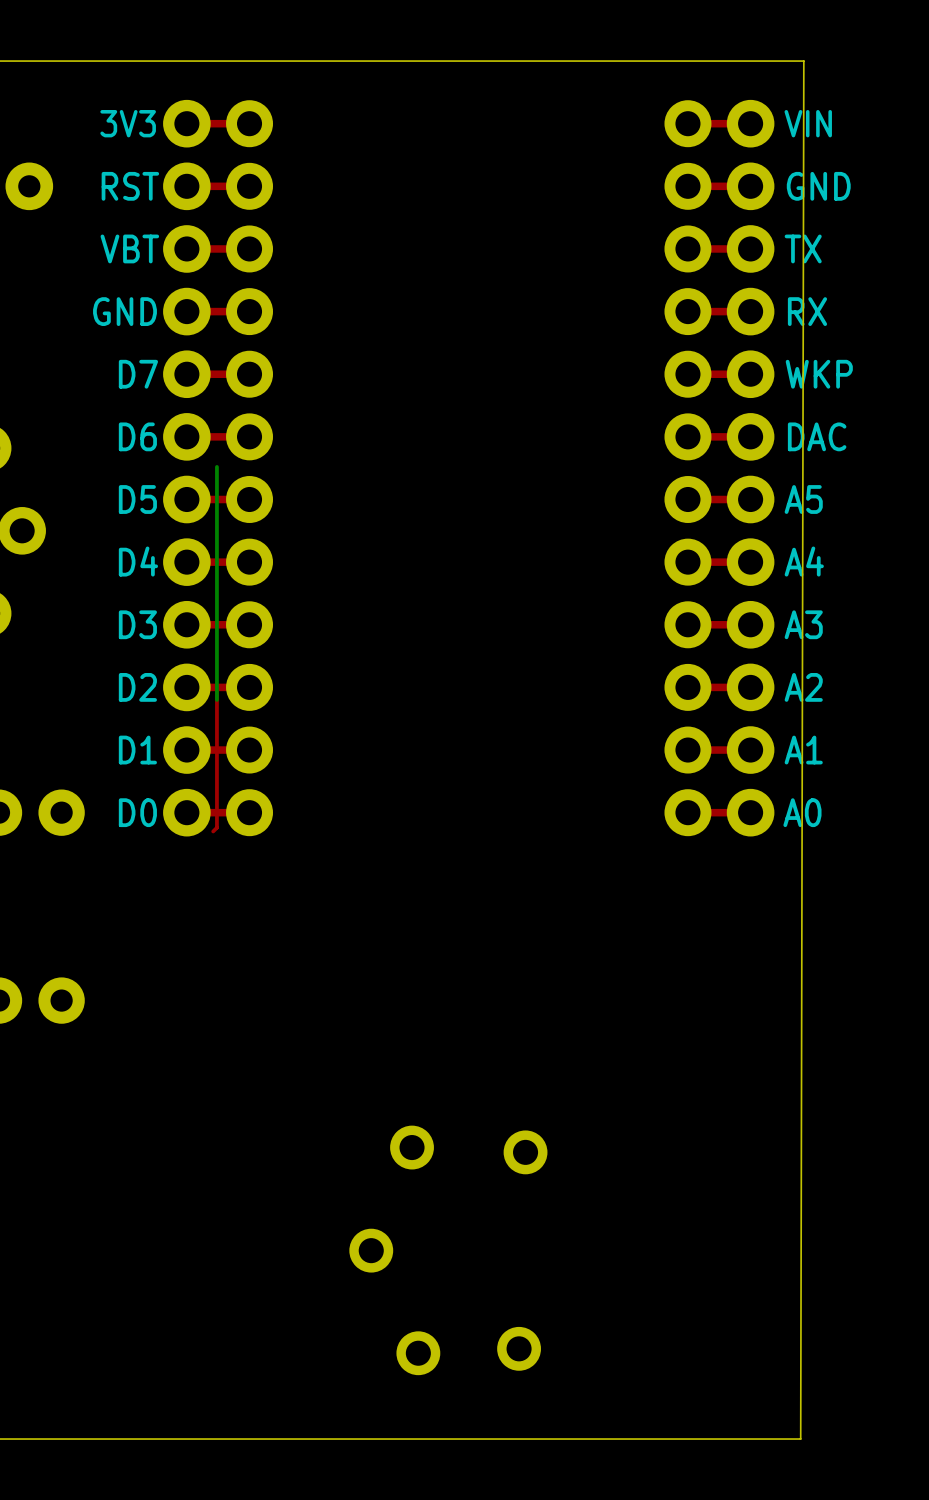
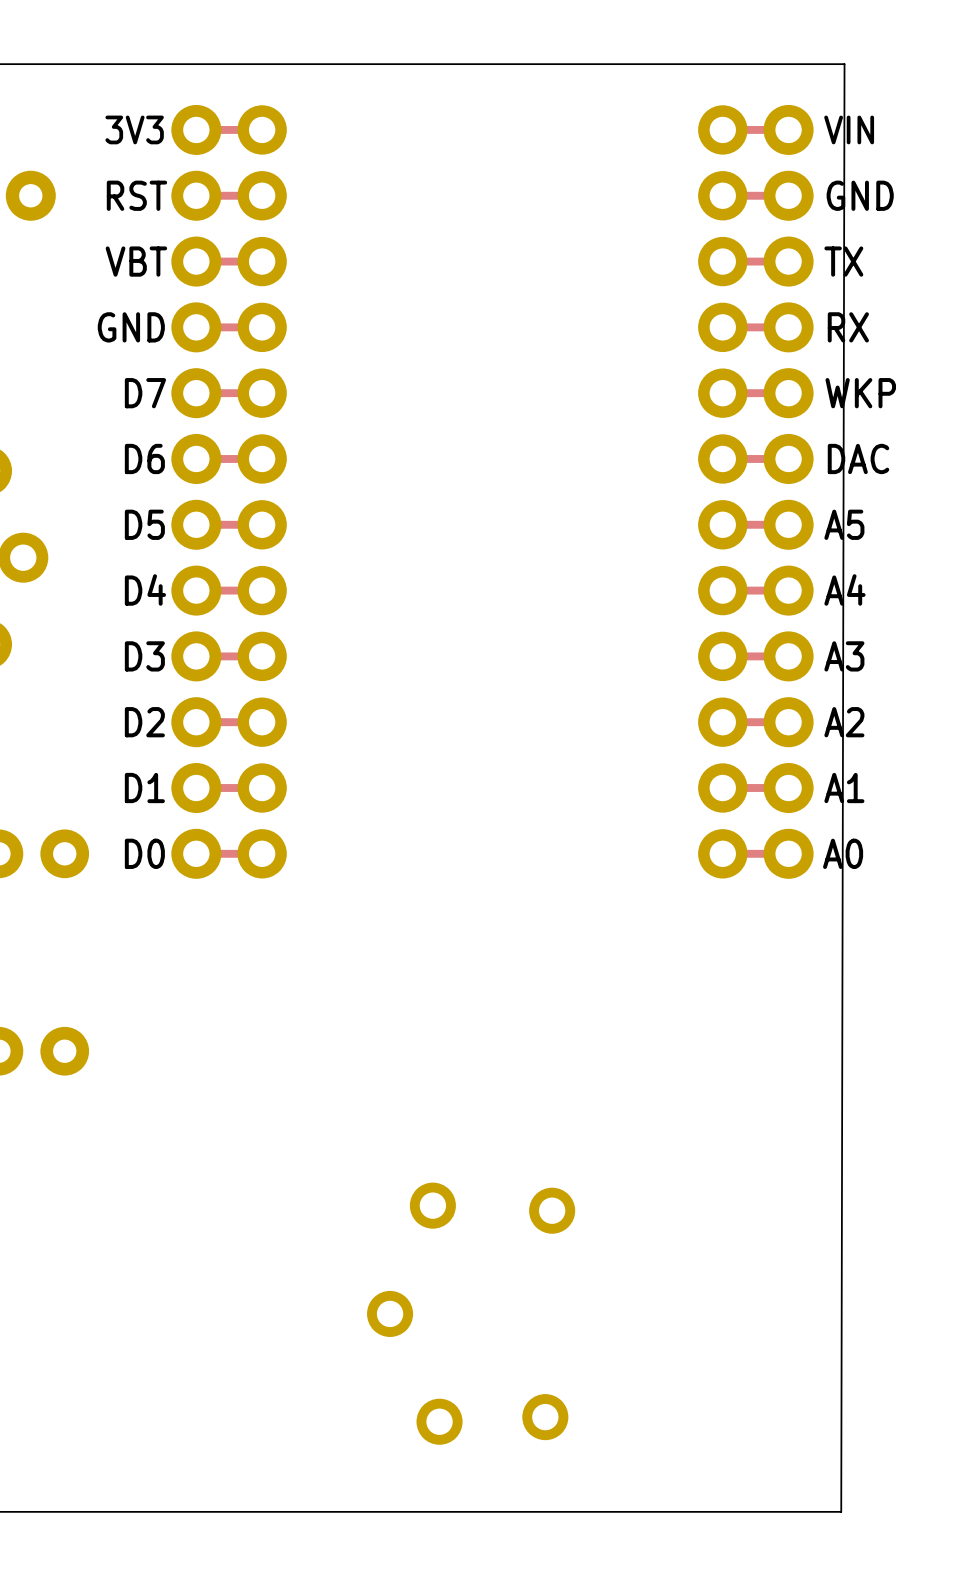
bottom track: (216, 466) (216, 699) -> none
top track: (216, 688) (216, 827) (213, 831) -> none

